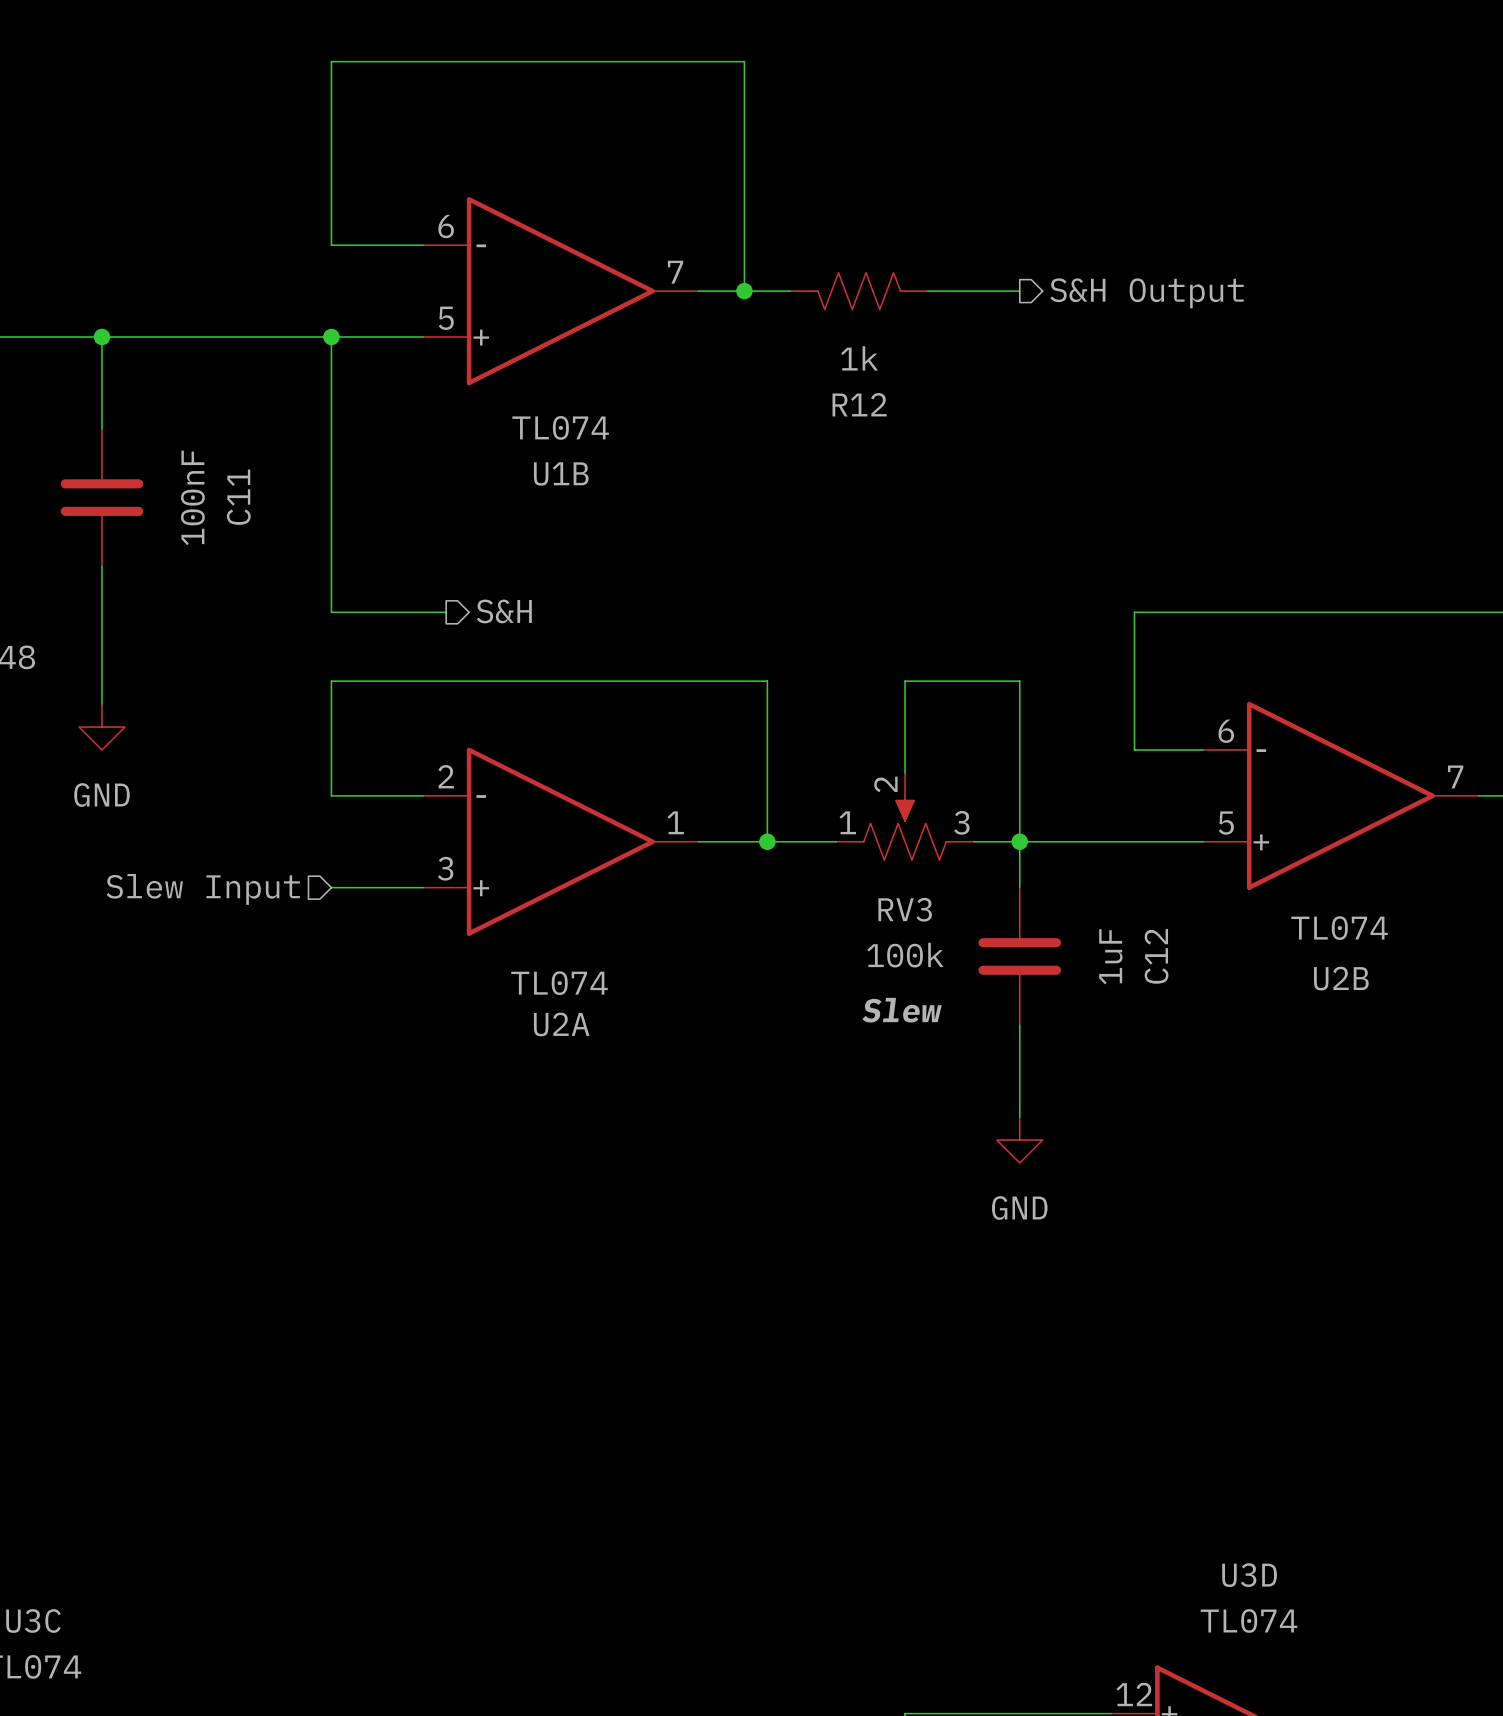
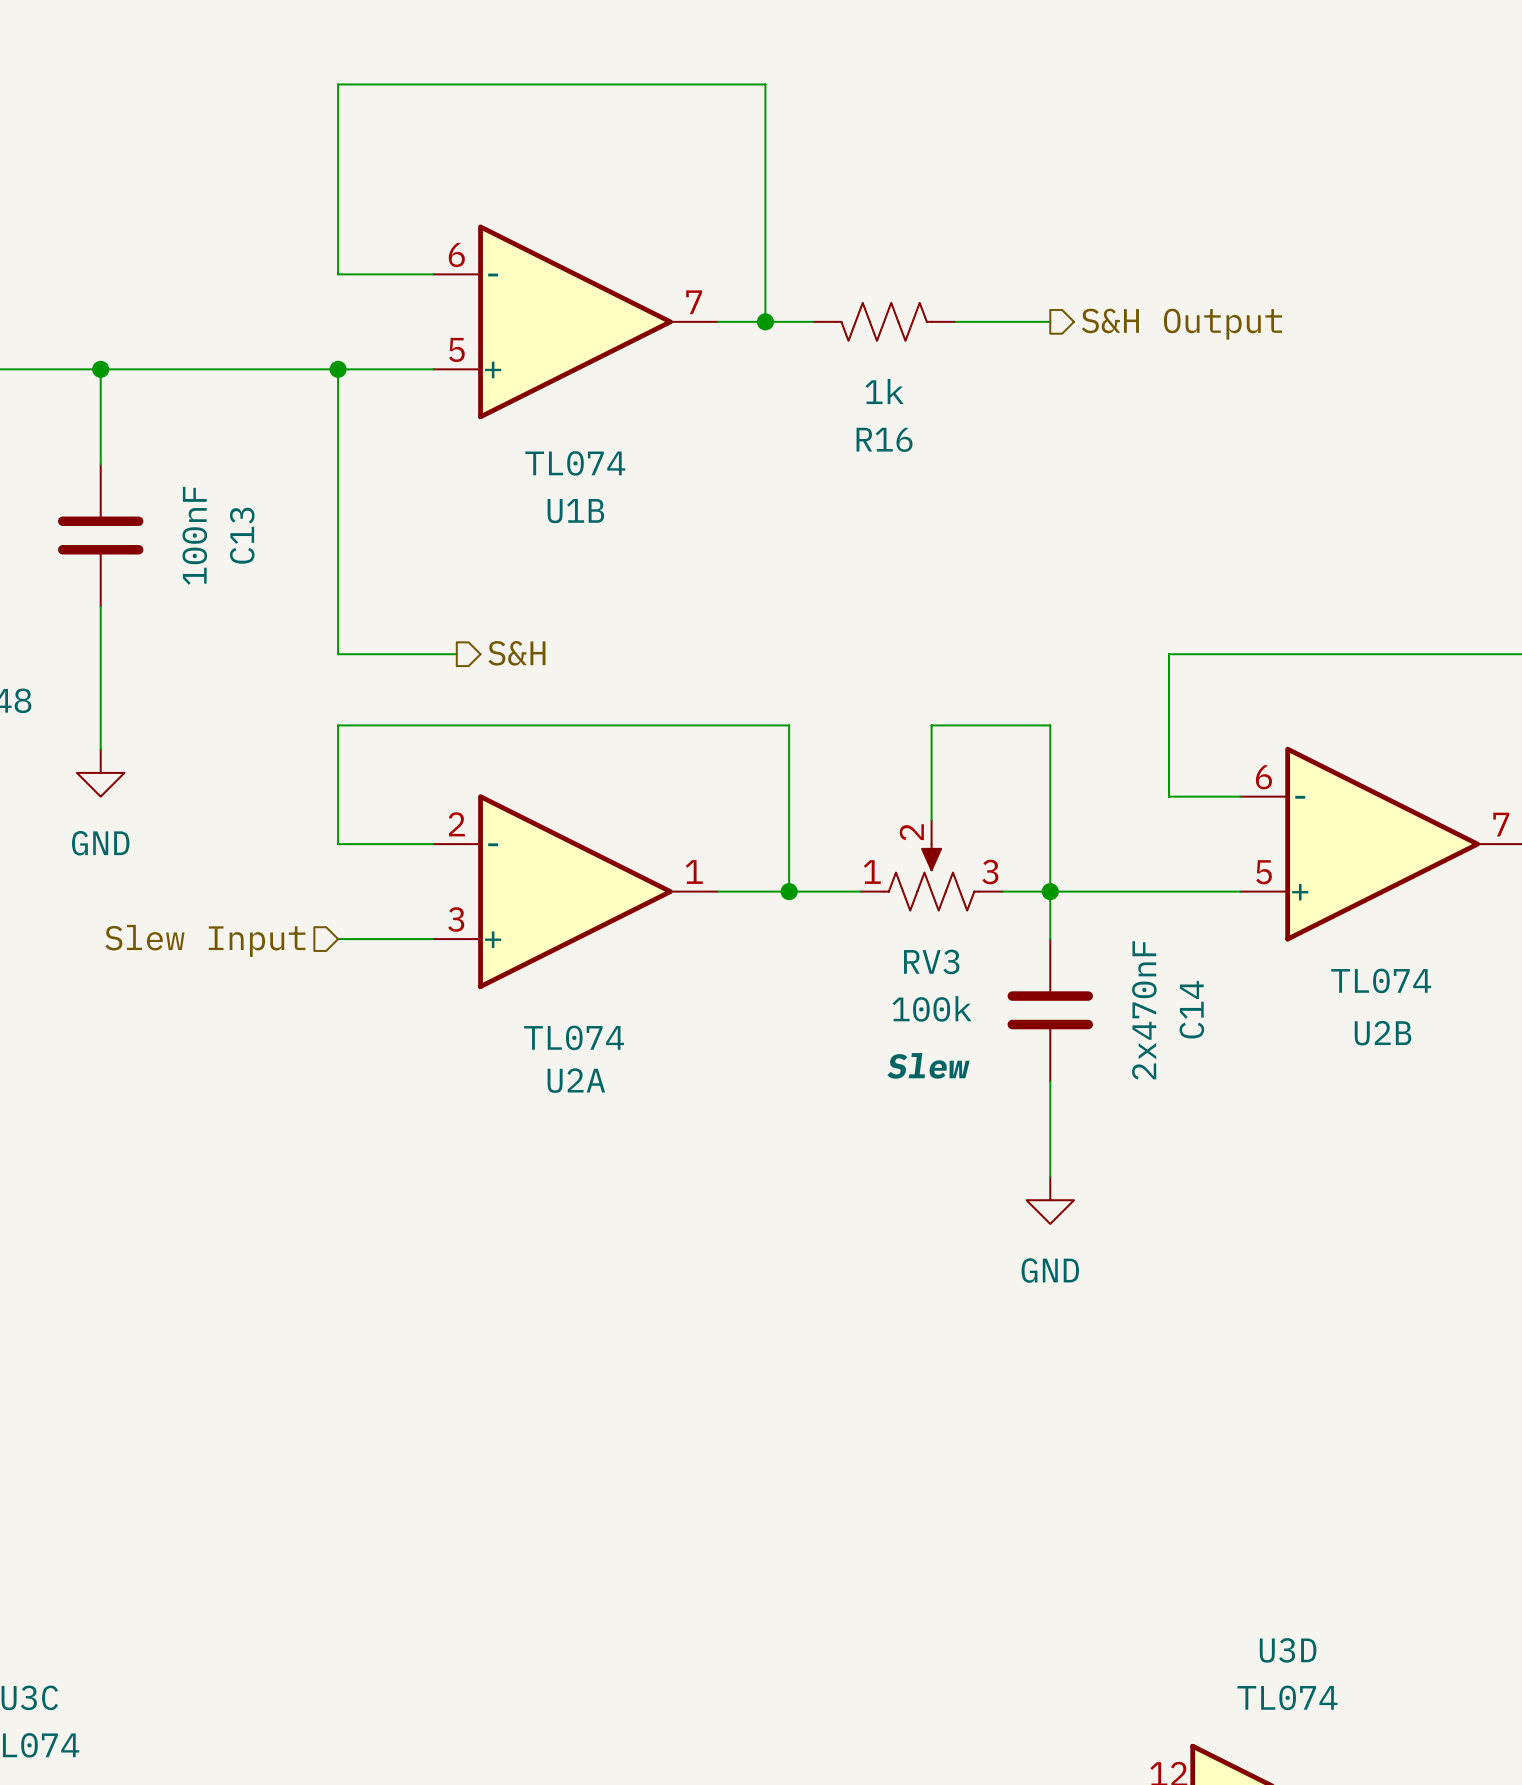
R12 name: R12 (859, 404) -> R16 (884, 439)
C11 name: C11 (238, 497) -> C13 (242, 535)
C12 value: 1uF (1110, 956) -> 2x470nF (1144, 1010)
C12 name: C12 (1156, 956) -> C14 (1191, 1009)

